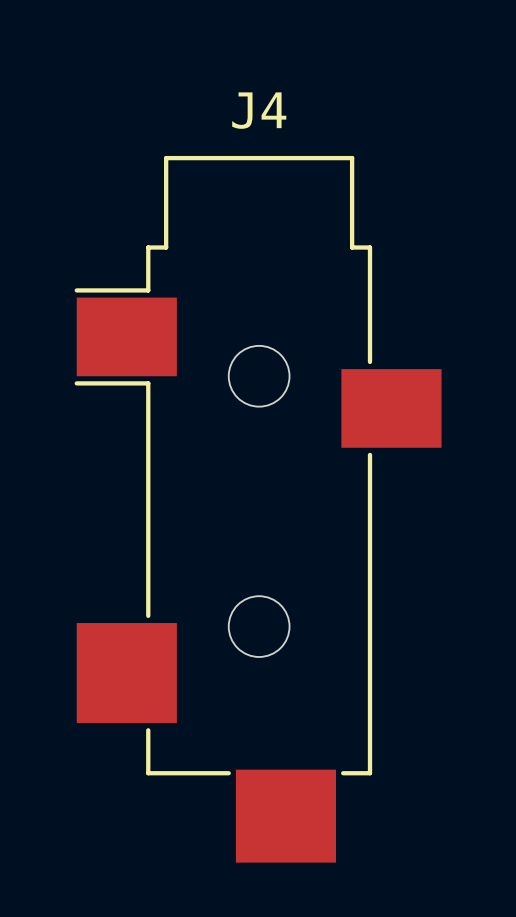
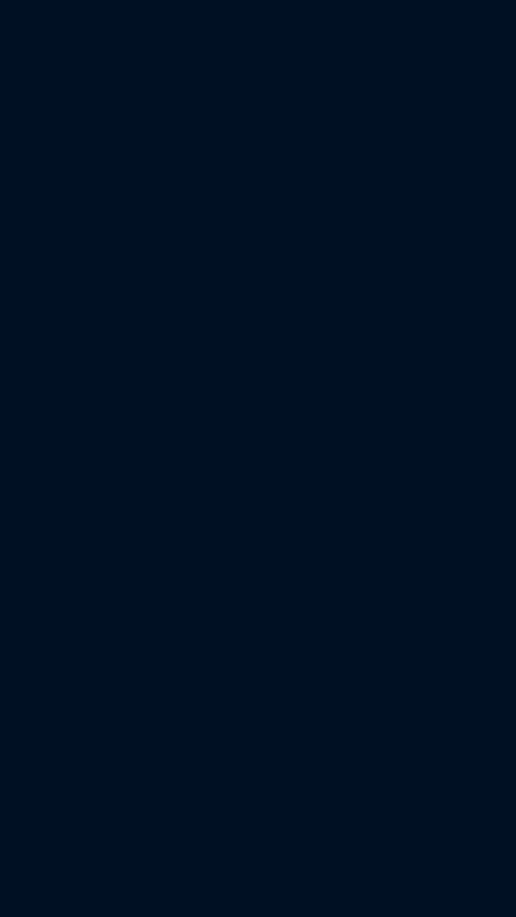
J4: (258, 509) -> none

